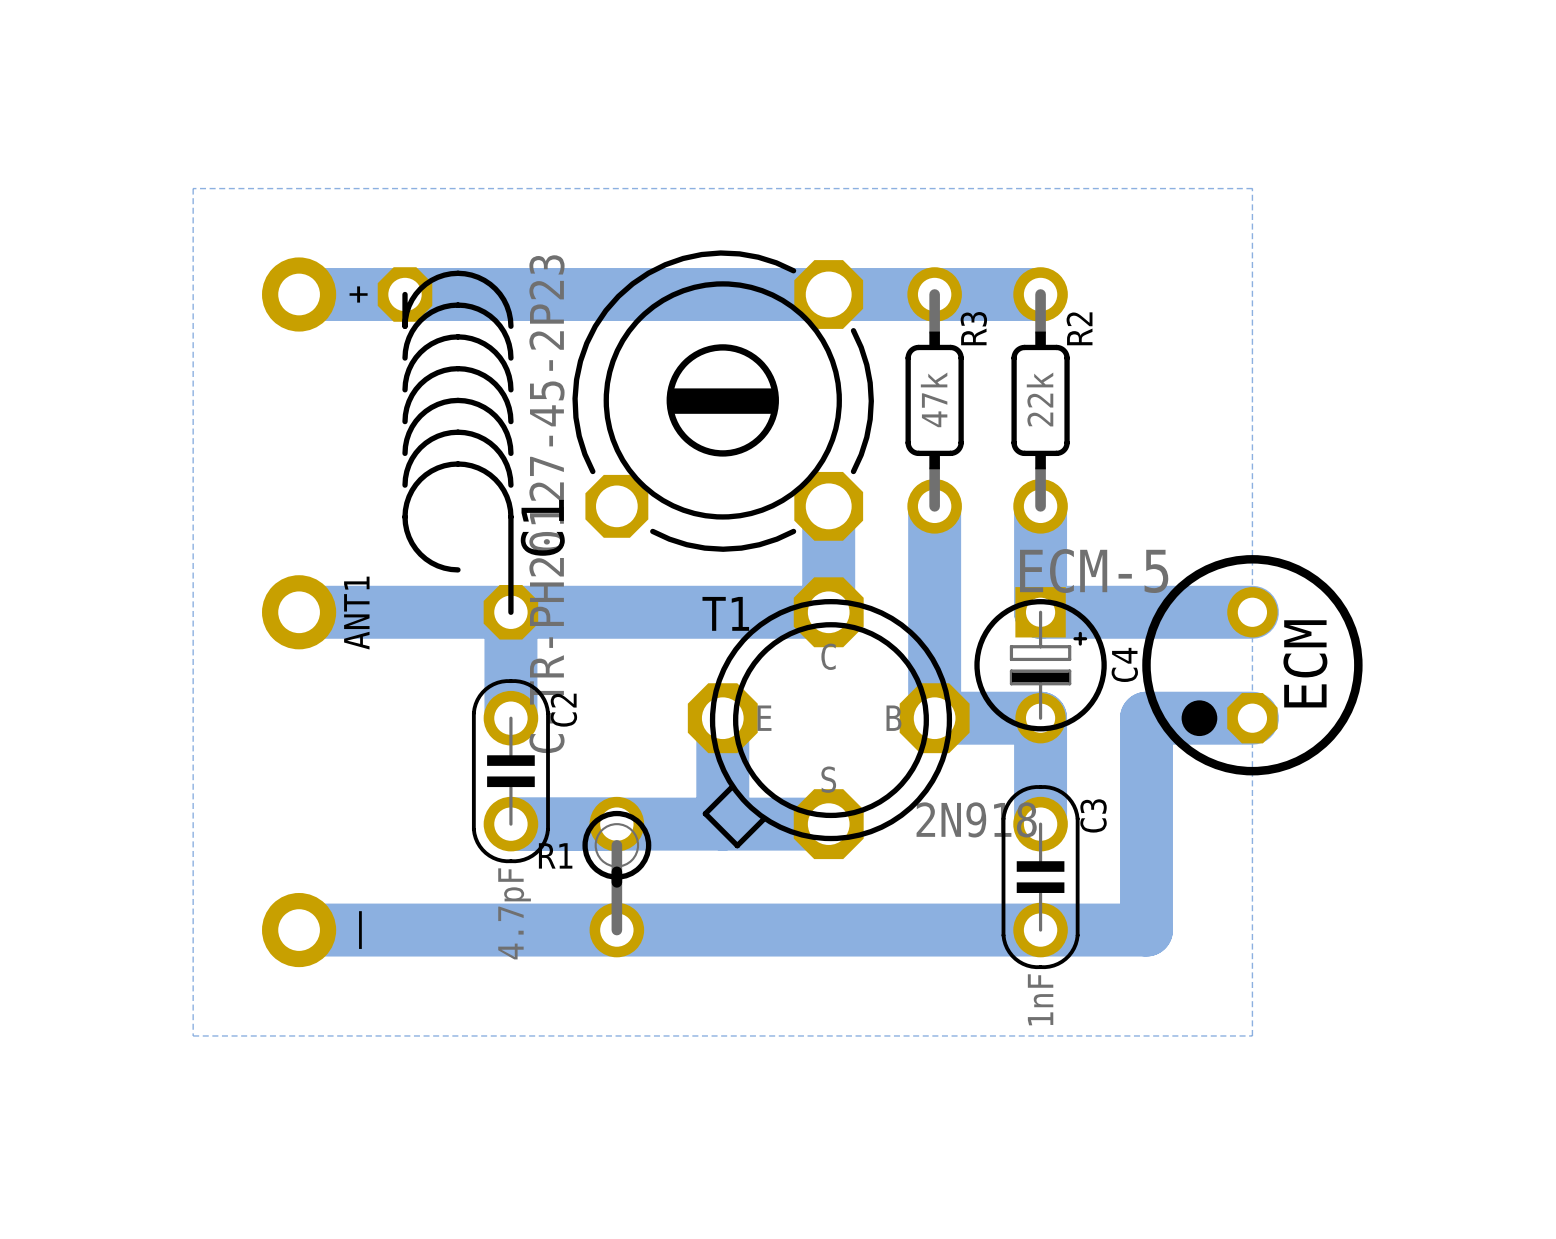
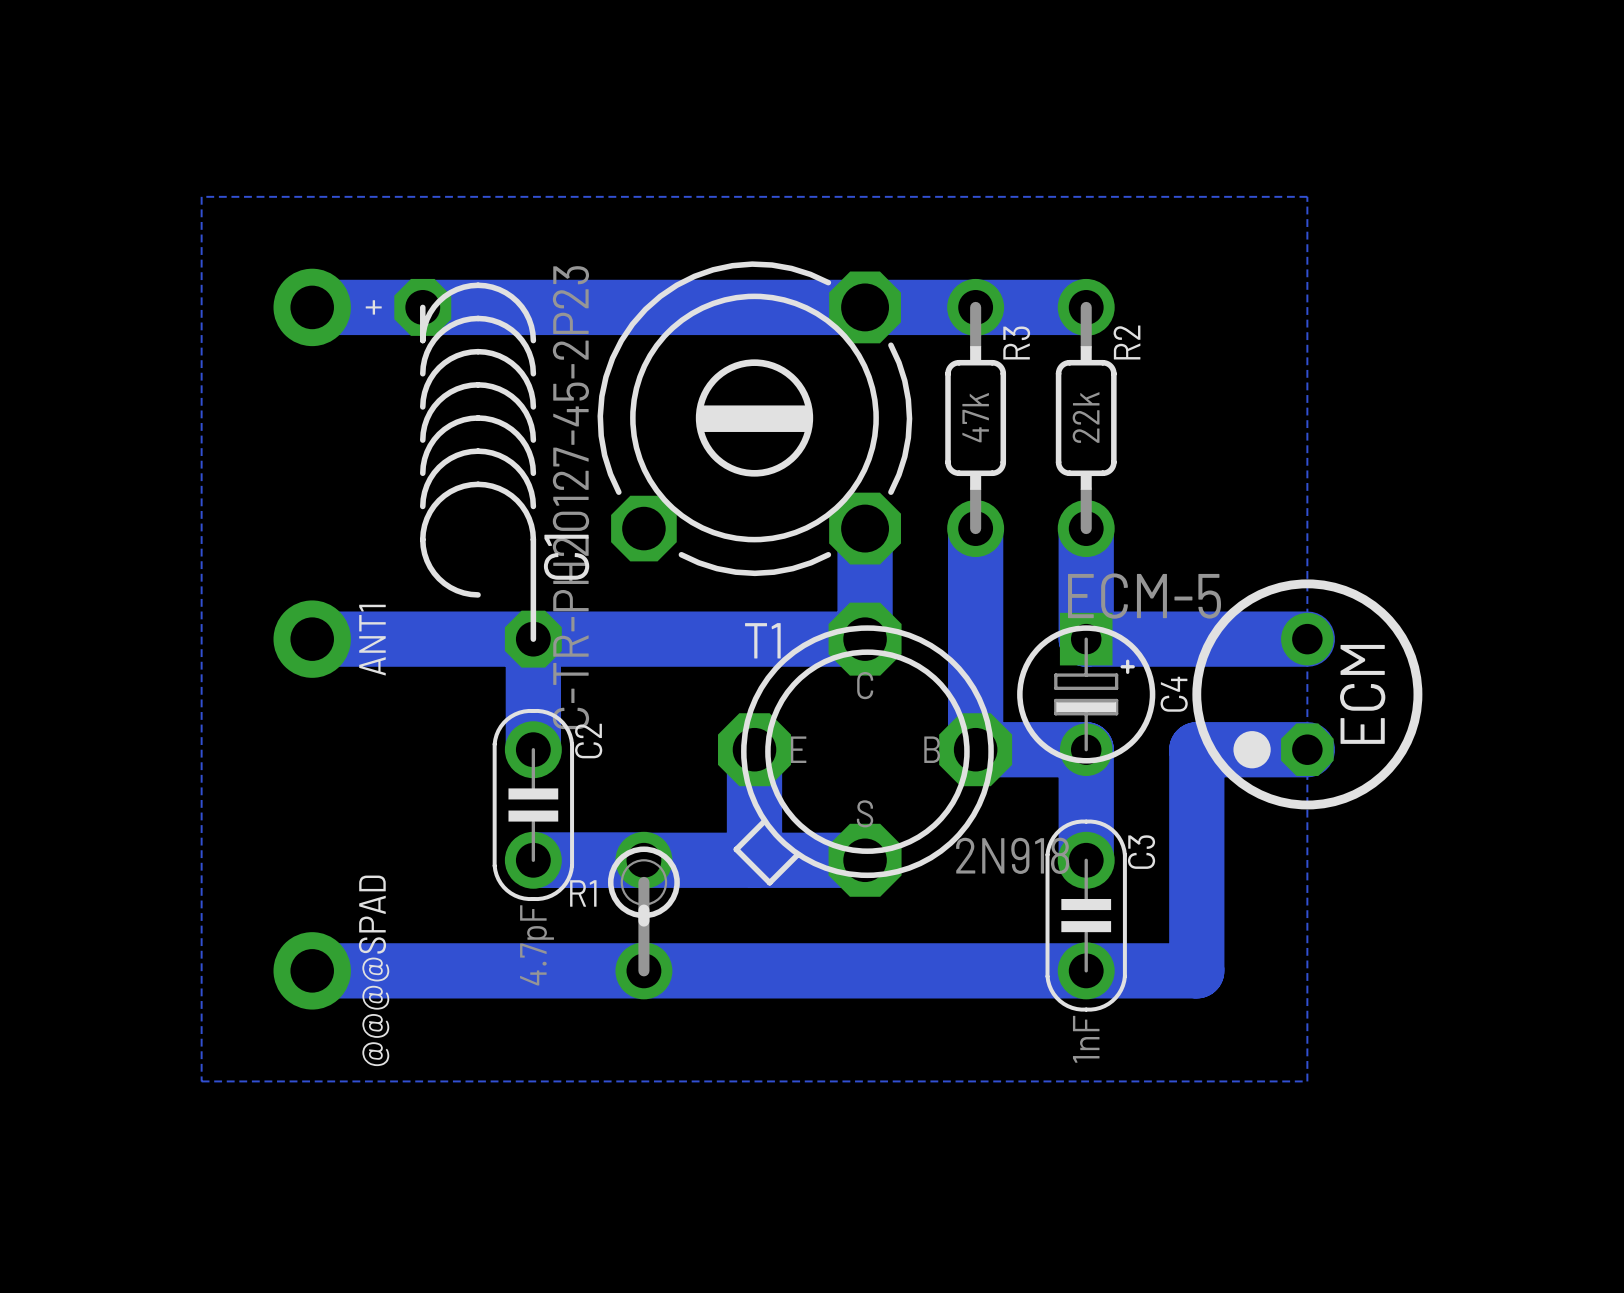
@@@@SPAD name: ̶̶ (360, 930) -> @@@@SPAD (374, 970)

